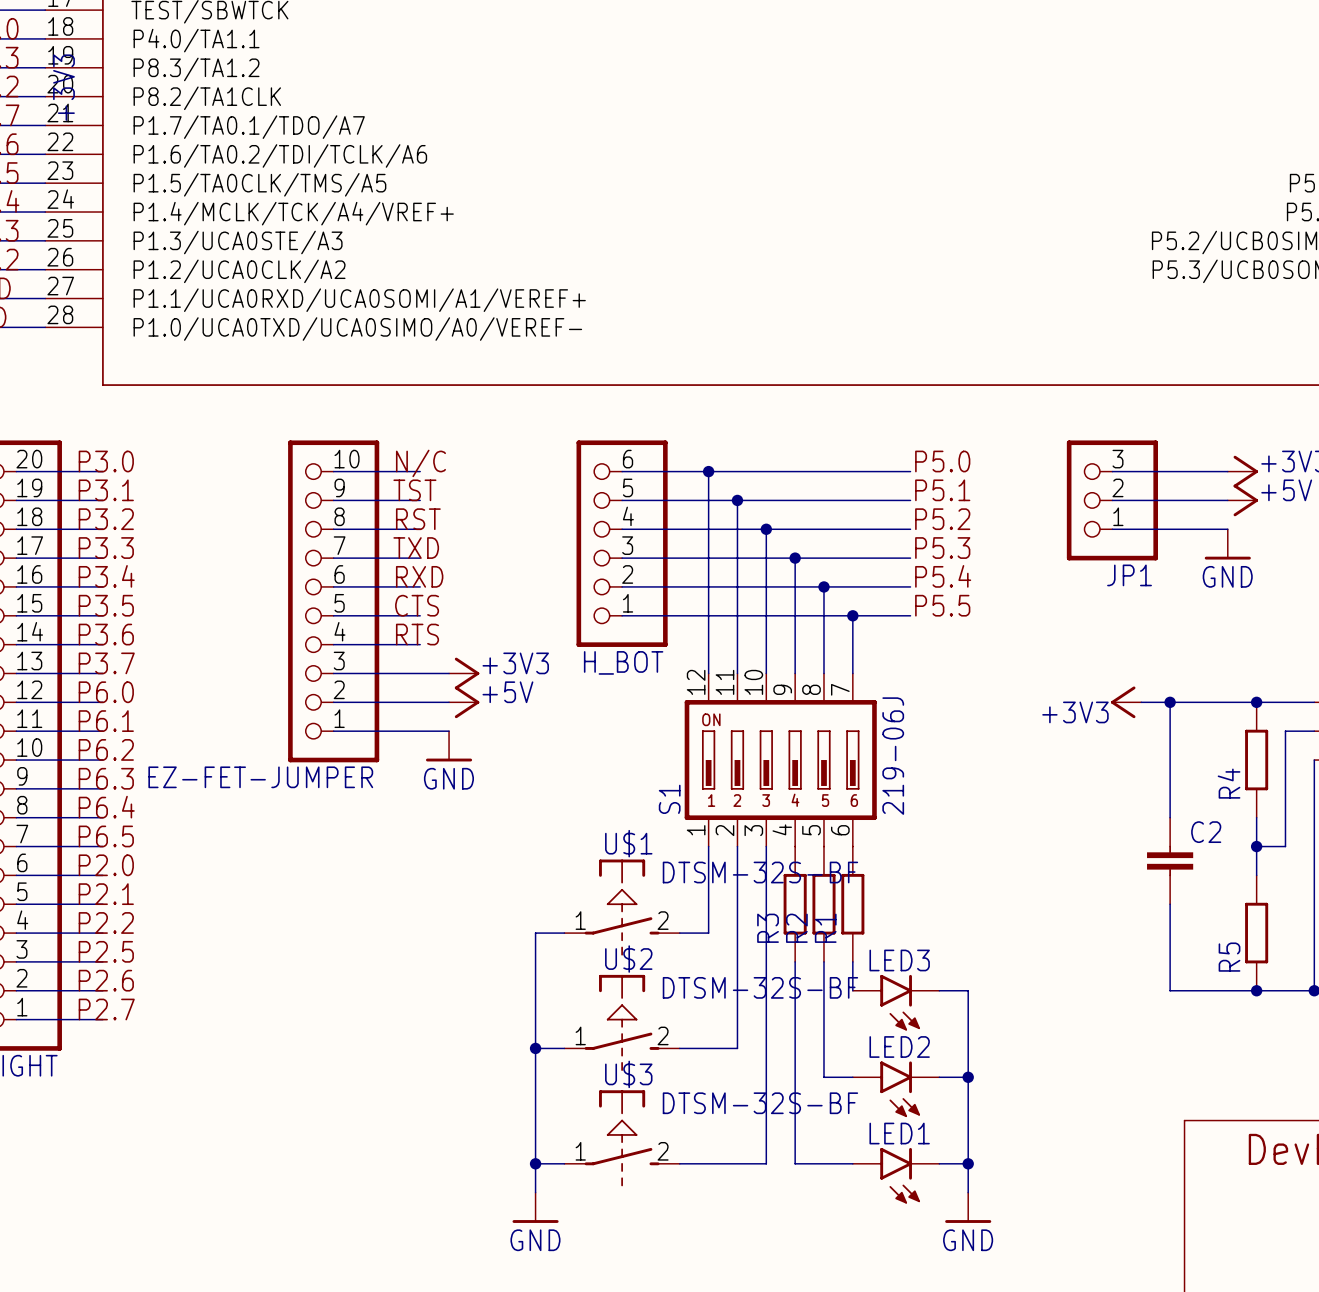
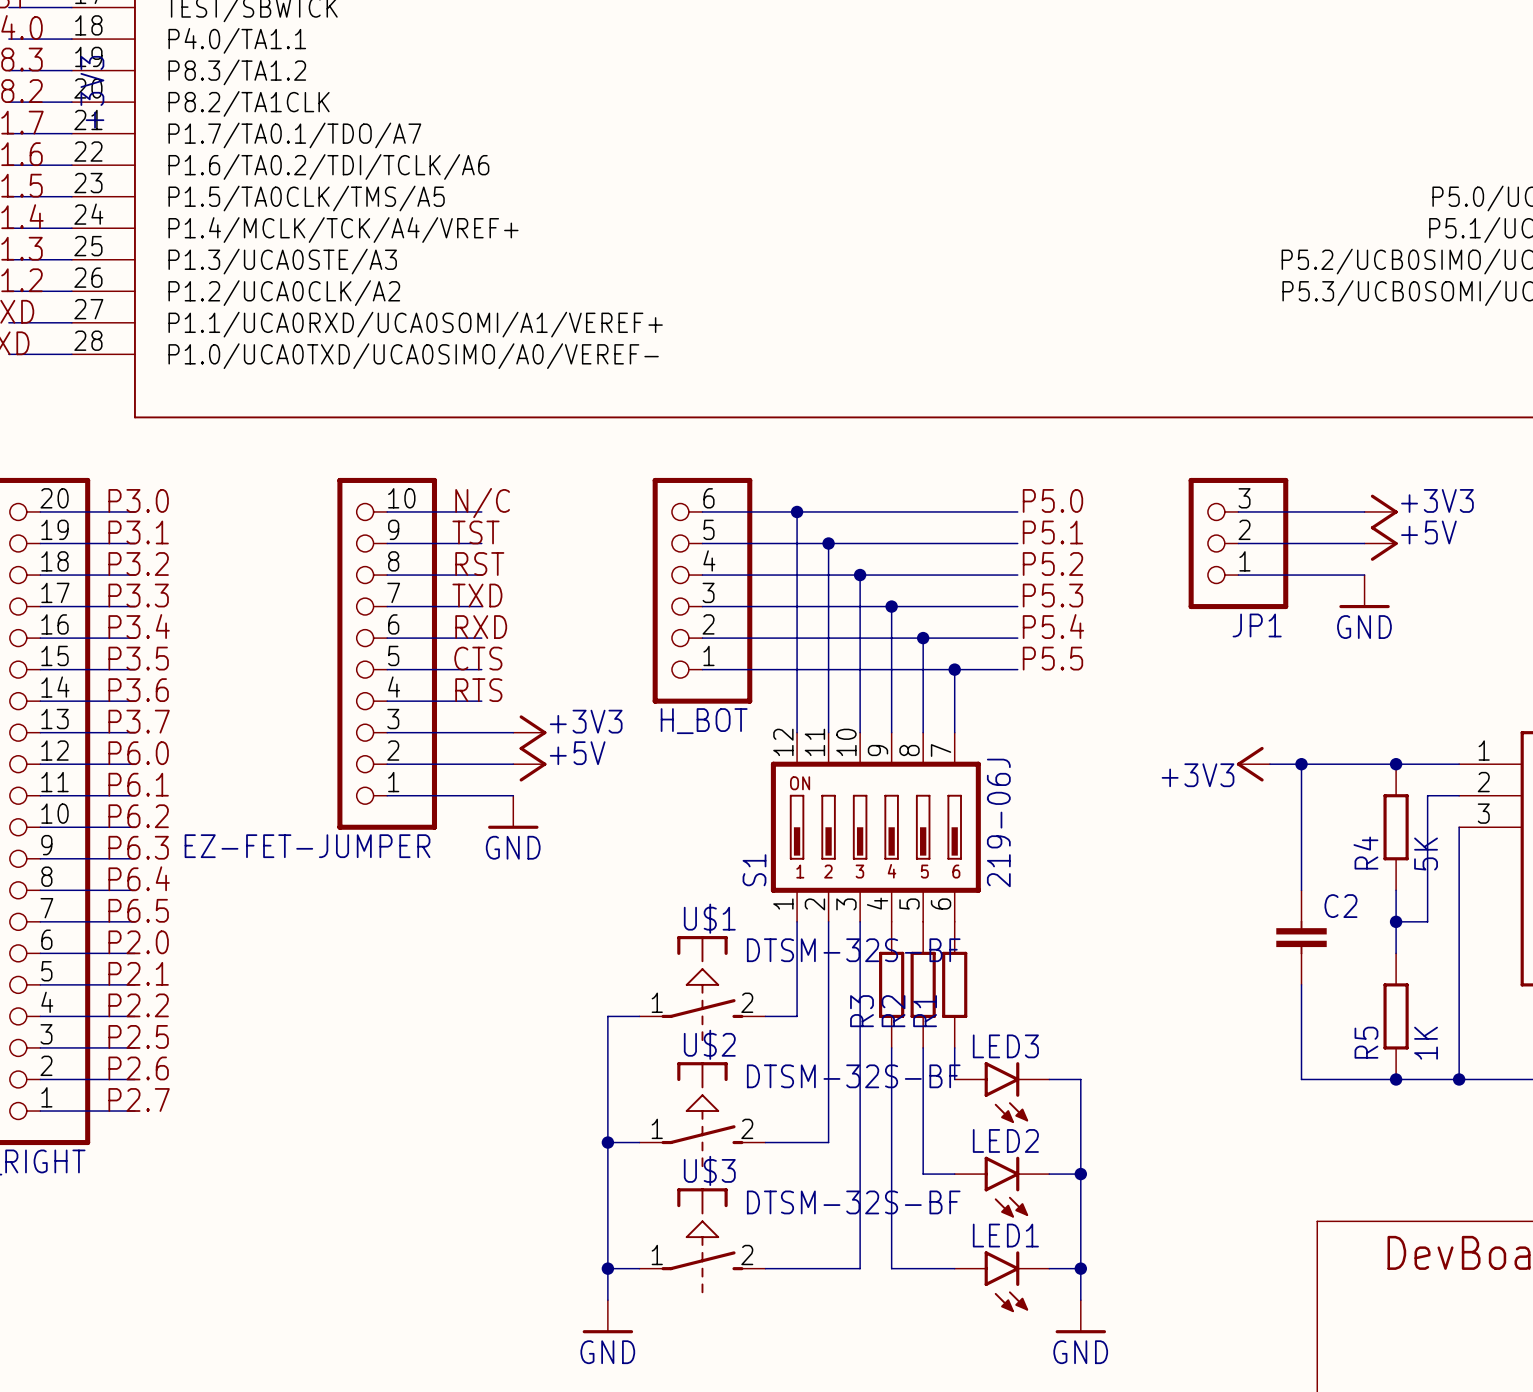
R4 value: none -> 5K (1426, 854)
R5 value: none -> 1K (1426, 1043)

